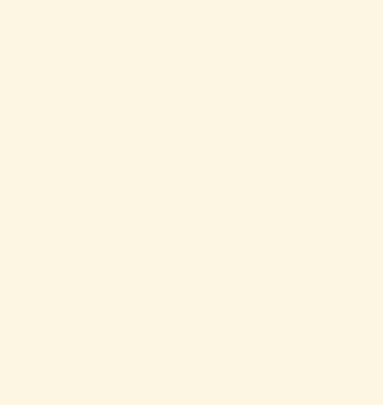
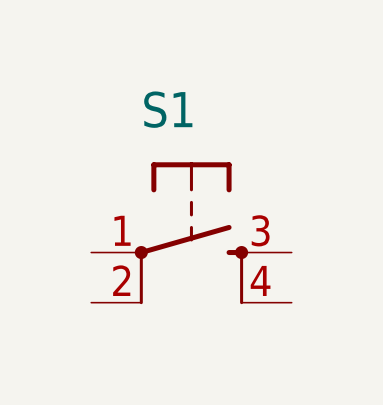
S1: none -> (191, 233)

